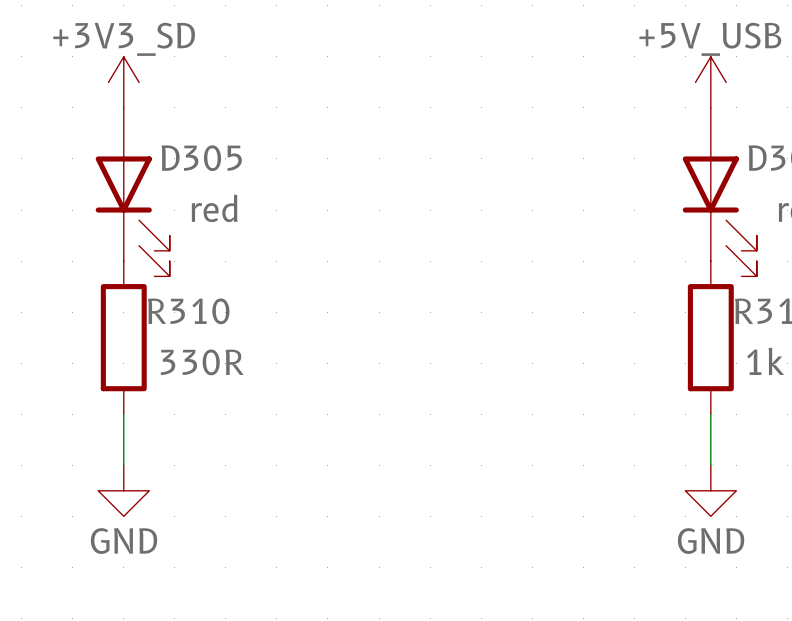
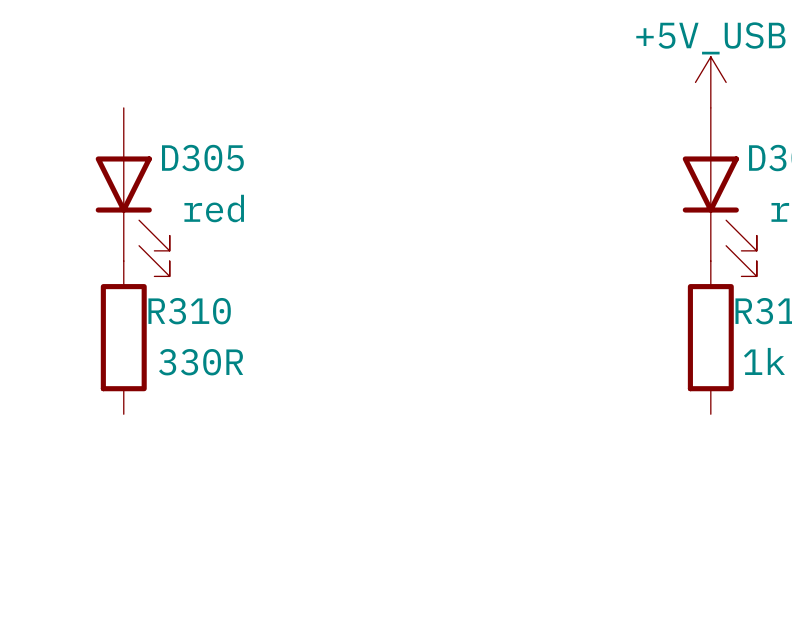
power symbol: +3V3_SD (123, 82) -> none
wire: (123, 414) (123, 465) -> none
wire: (710, 414) (710, 465) -> none
power symbol: GND (123, 490) -> none
power symbol: GND (710, 490) -> none

